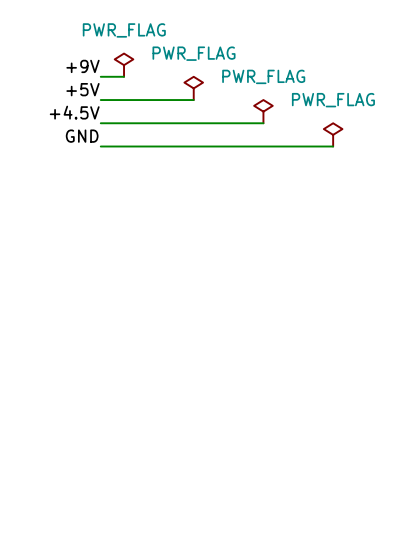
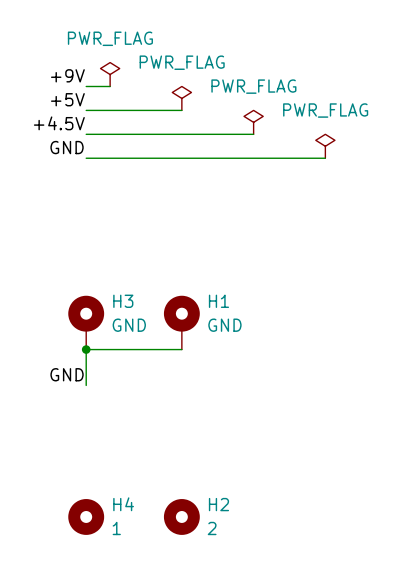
H3: none -> GND (86, 322)
H1: none -> GND (181, 322)
junction: none -> (86, 349)
wire: none -> (181, 349) (86, 349) (86, 385)
label: none -> GND (67, 374)
H4: none -> 1 (86, 516)
H2: none -> 2 (181, 516)

